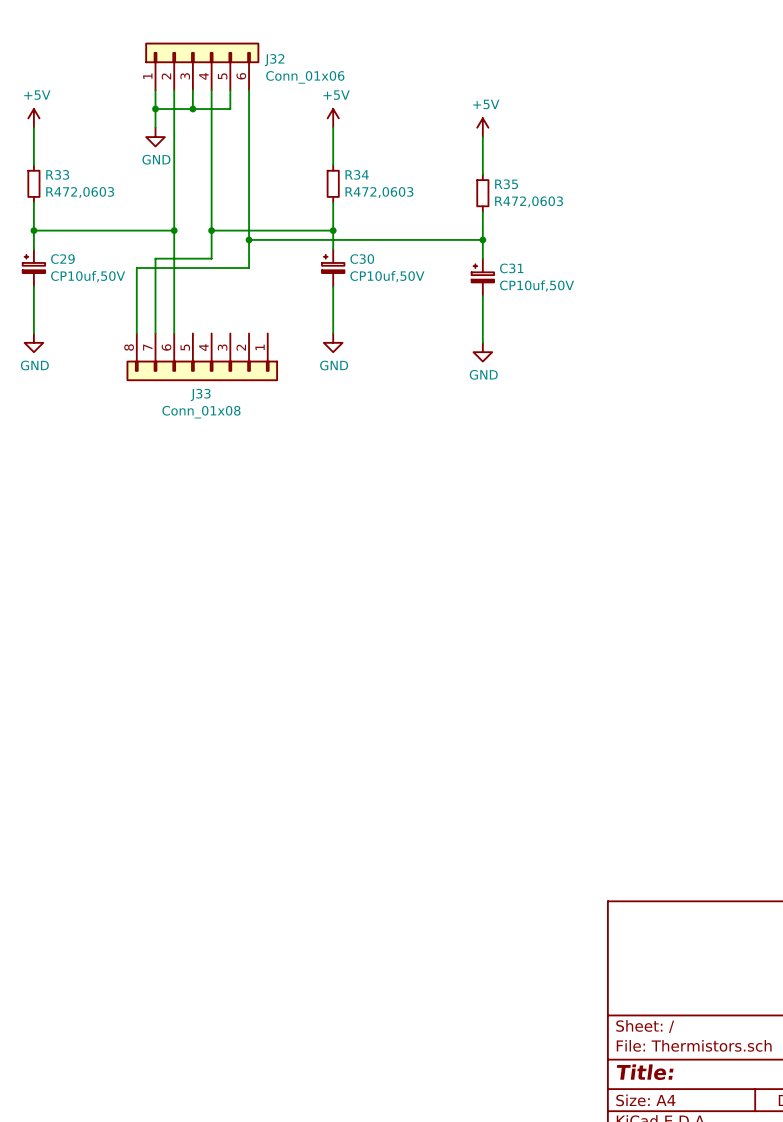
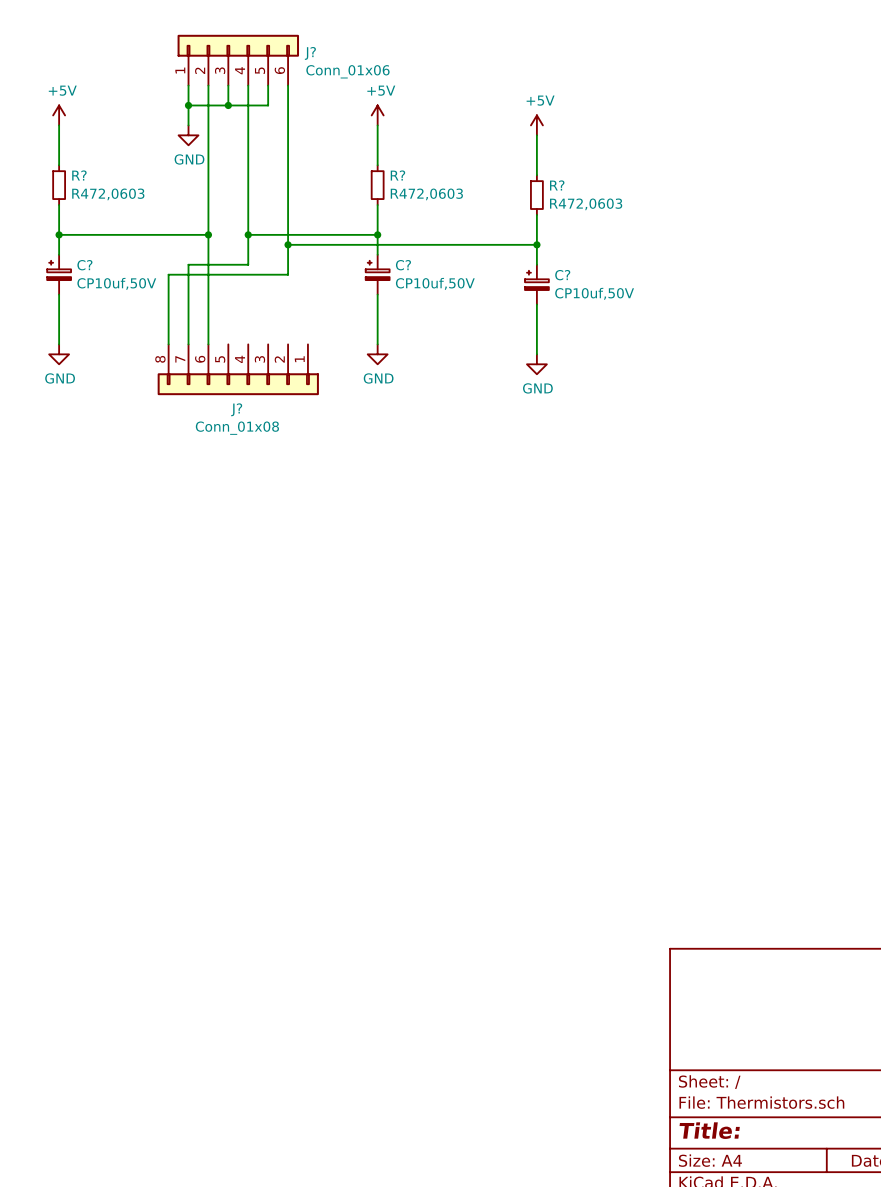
J32 name: J32 (274, 60) -> J? (310, 53)
R33 name: R33 (57, 174) -> R? (79, 175)
R34 name: R34 (357, 174) -> R? (397, 175)
R35 name: R35 (506, 184) -> R? (557, 185)
C29 name: C29 (62, 259) -> C? (84, 265)
C30 name: C30 (362, 259) -> C? (403, 265)
C31 name: C31 (511, 268) -> C? (562, 275)
J33 name: J33 (200, 394) -> J? (236, 409)

